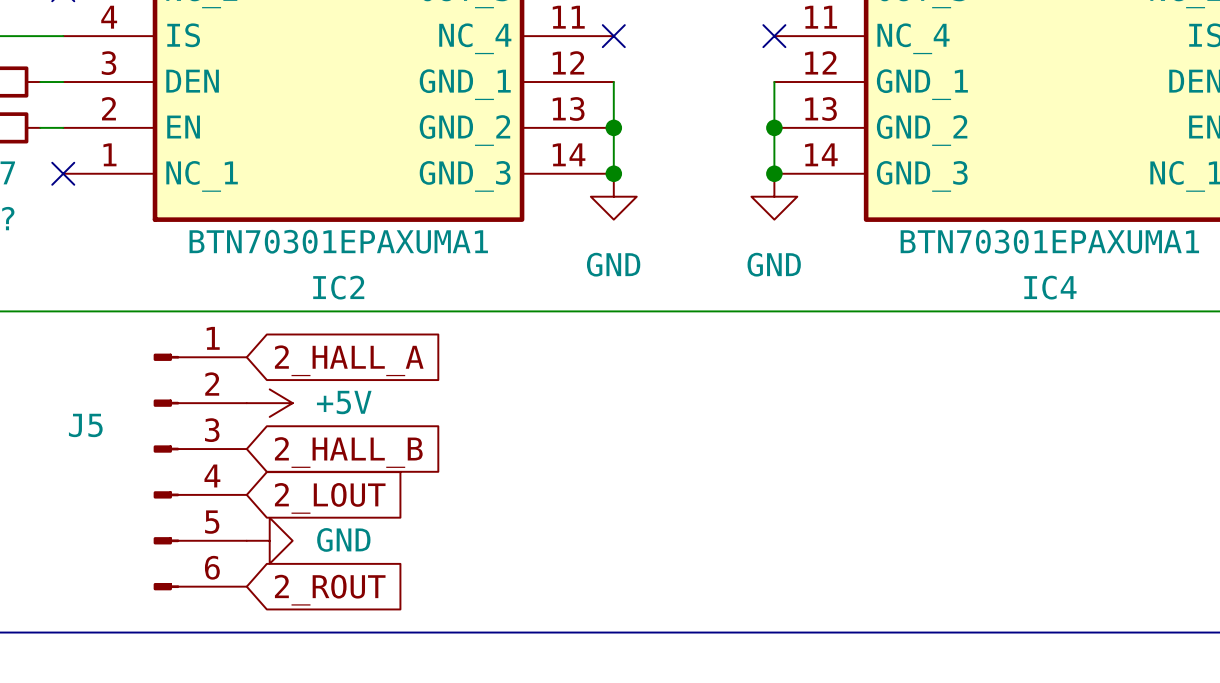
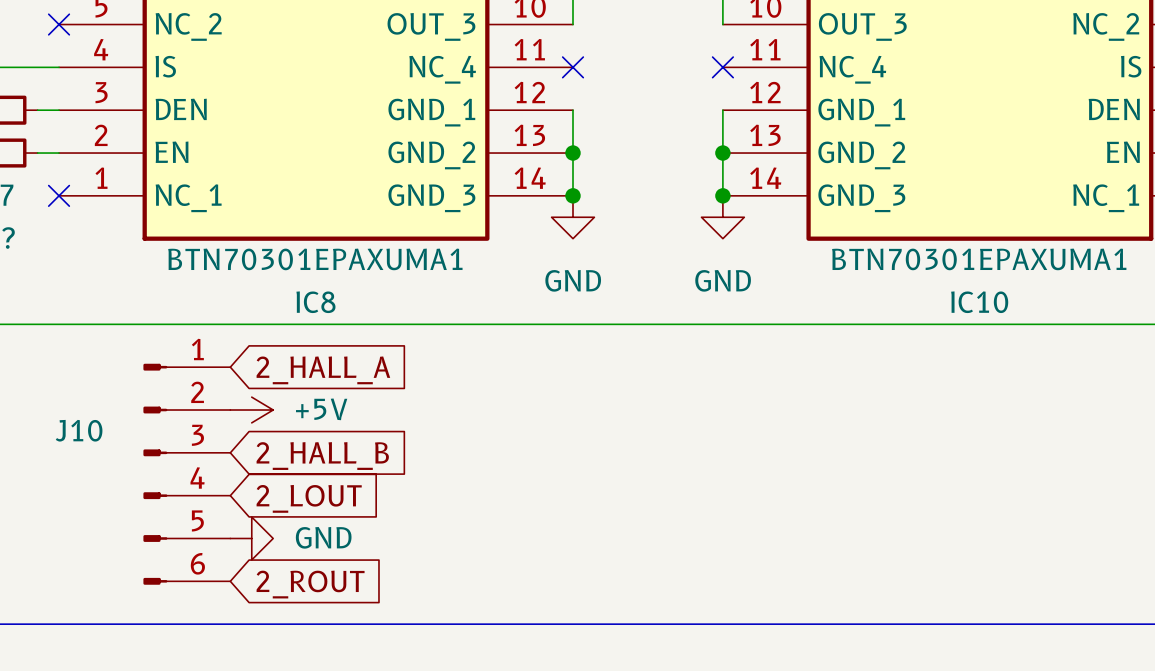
IC2 name: IC2 (338, 287) -> IC8 (315, 302)
IC4 name: IC4 (1050, 287) -> IC10 (979, 302)
J5 name: J5 (85, 425) -> J10 (79, 430)

